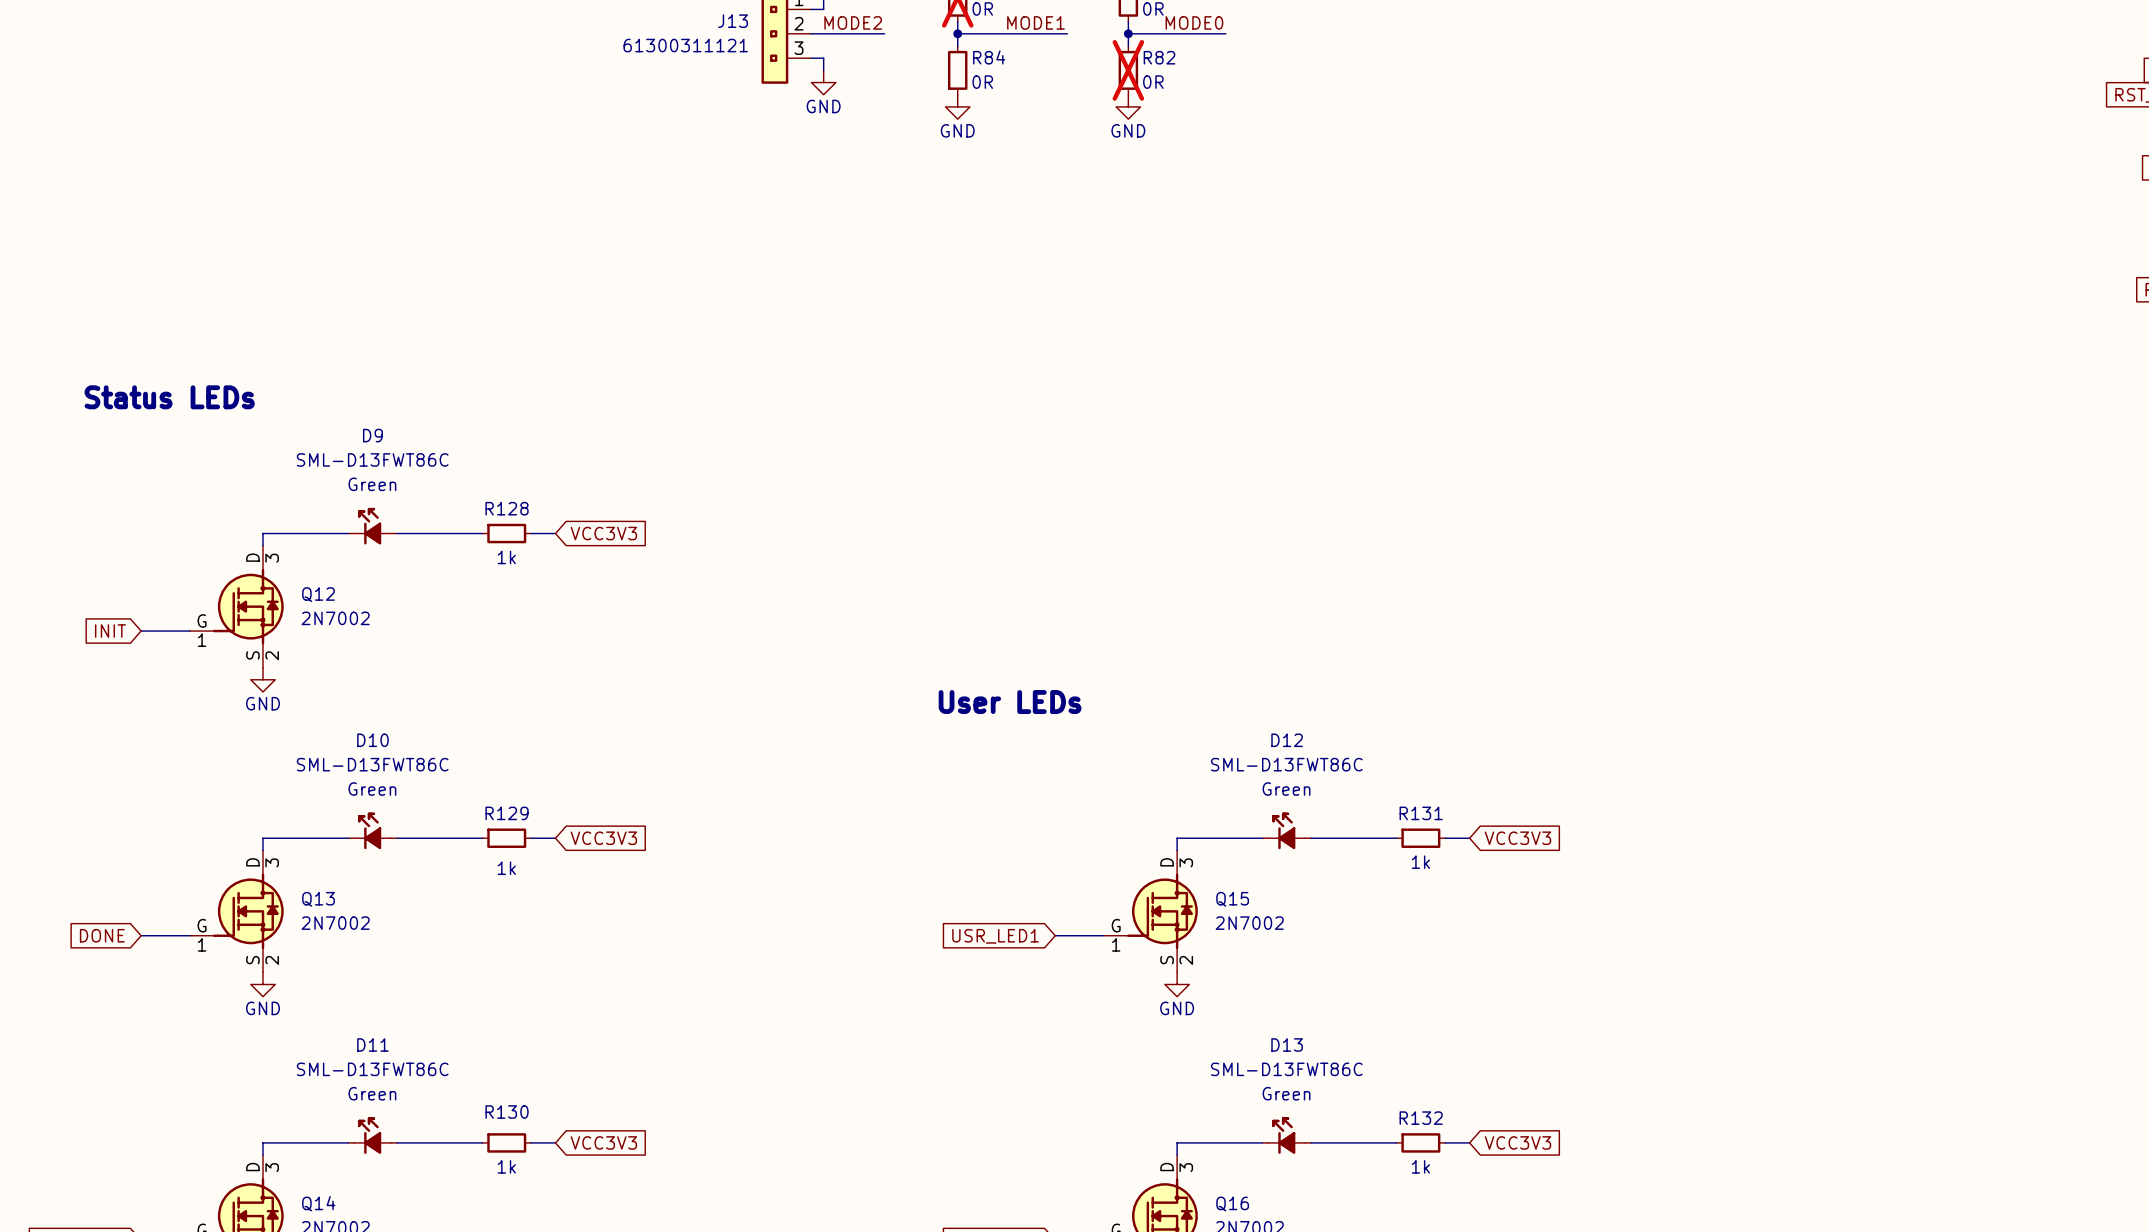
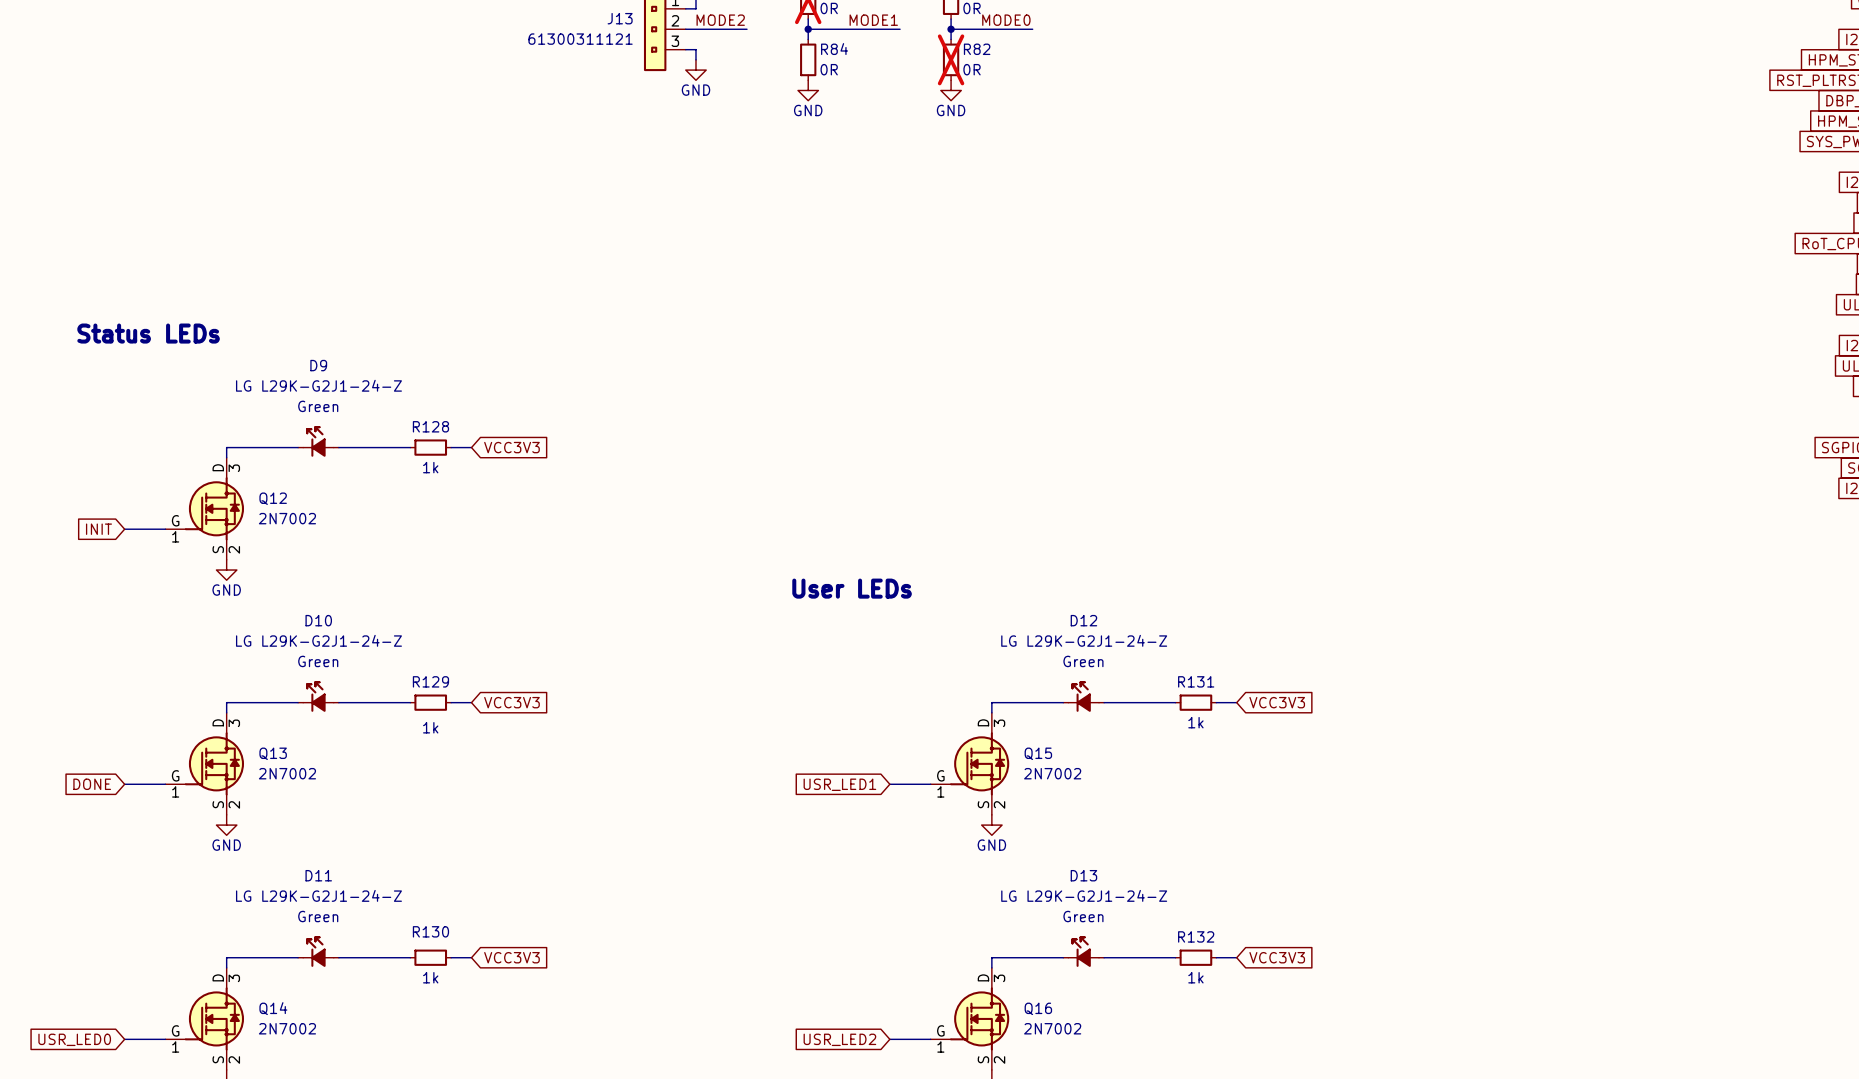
D9 text: SML-D13FWT86C (372, 459) -> LG L29K-G2J1-24-Z (318, 385)
D10 text: SML-D13FWT86C (372, 764) -> LG L29K-G2J1-24-Z (318, 640)
D12 text: SML-D13FWT86C (1286, 764) -> LG L29K-G2J1-24-Z (1084, 640)
D11 text: SML-D13FWT86C (372, 1069) -> LG L29K-G2J1-24-Z (318, 895)
D13 text: SML-D13FWT86C (1286, 1069) -> LG L29K-G2J1-24-Z (1084, 895)

